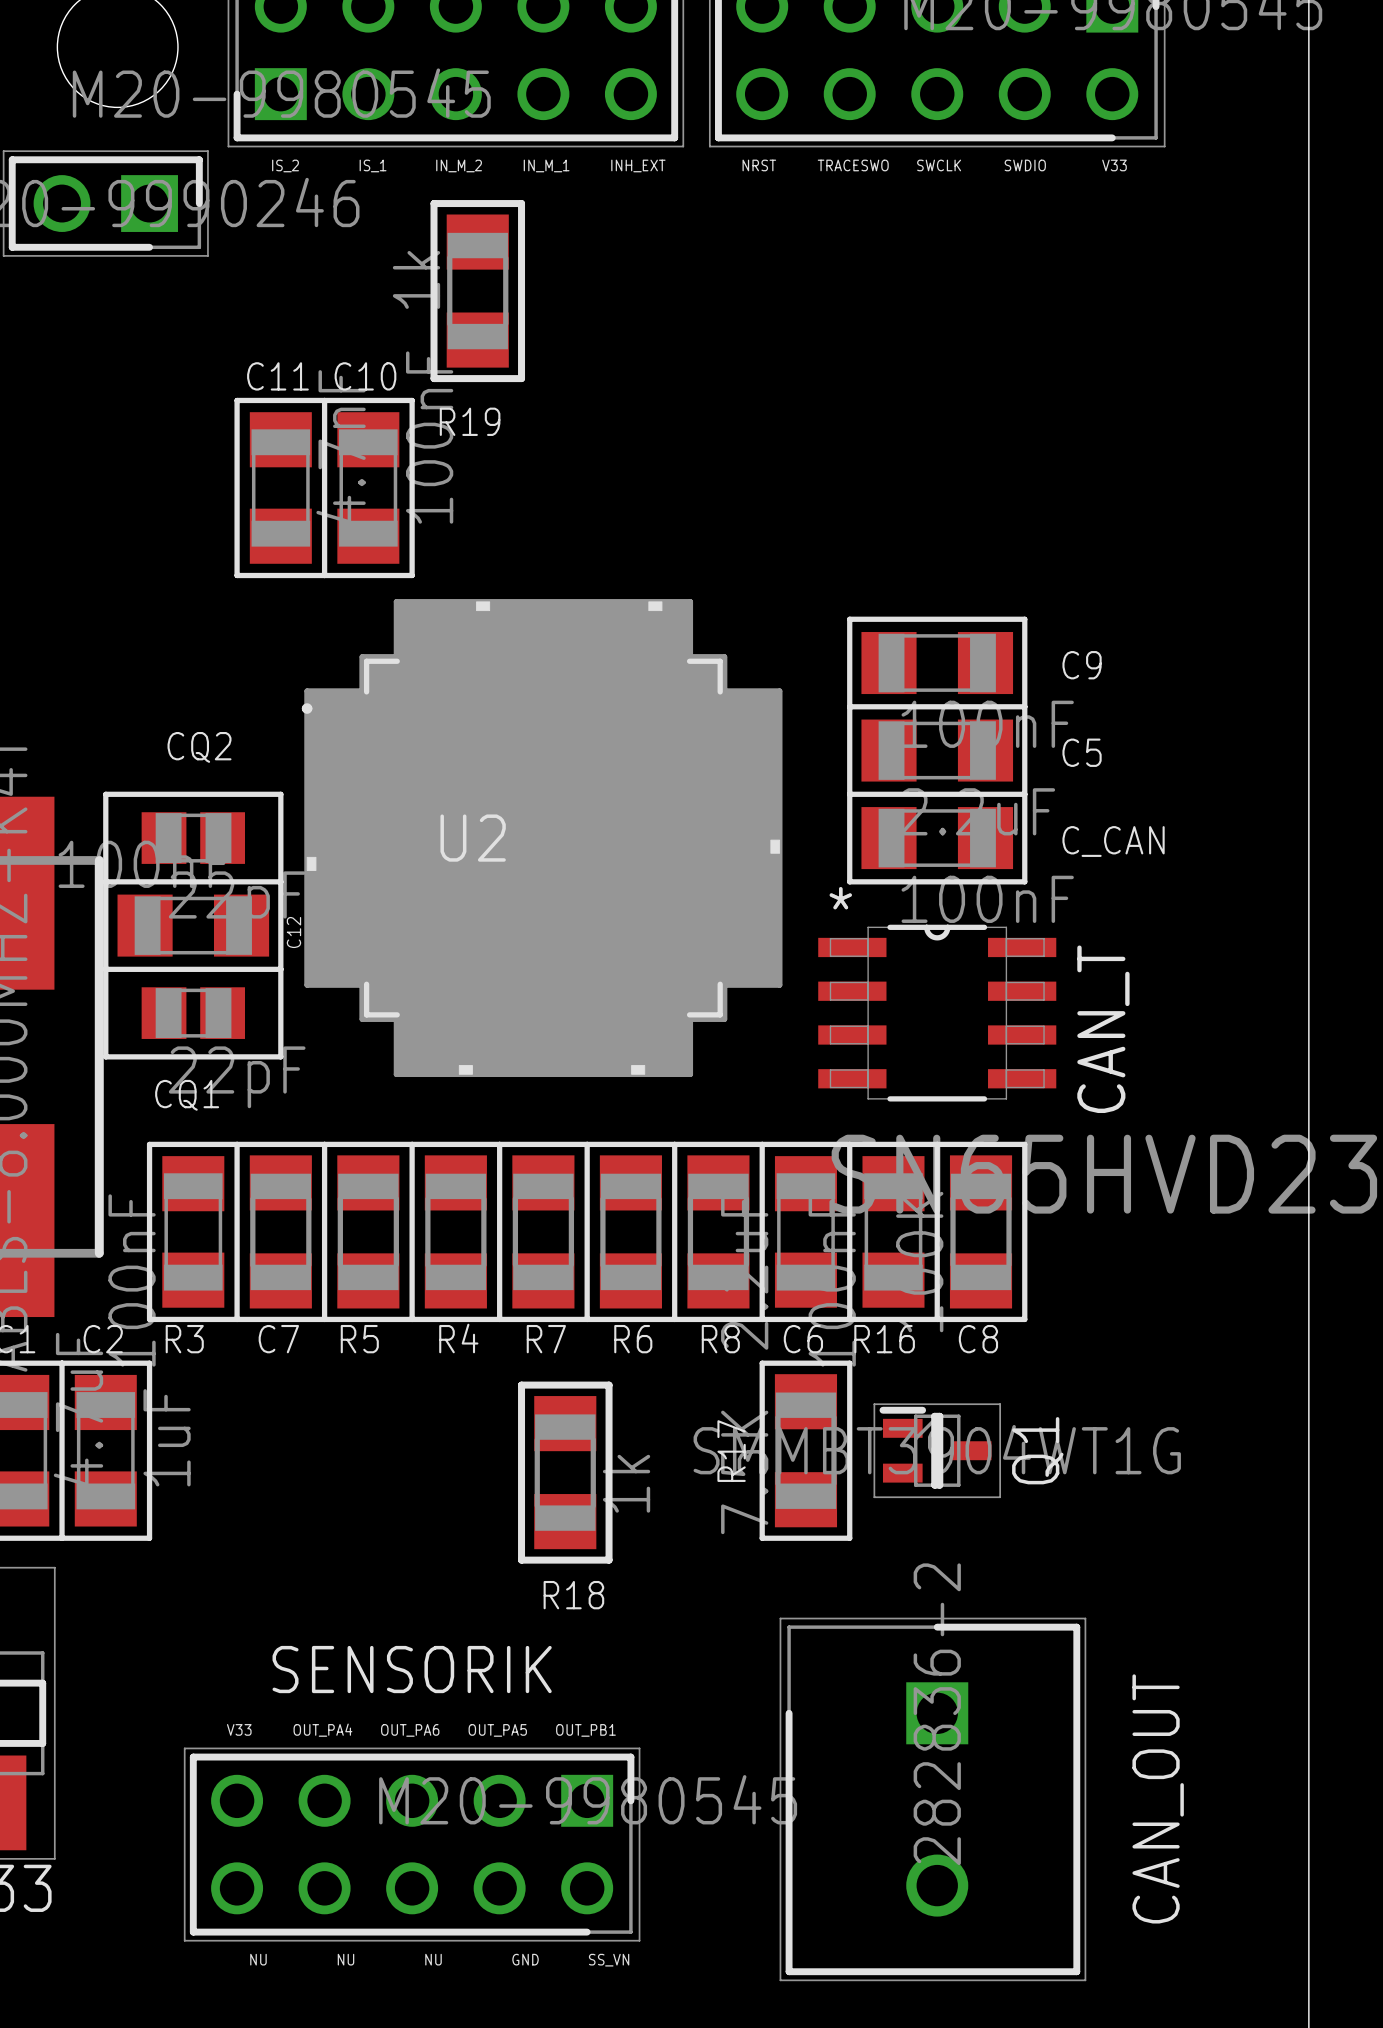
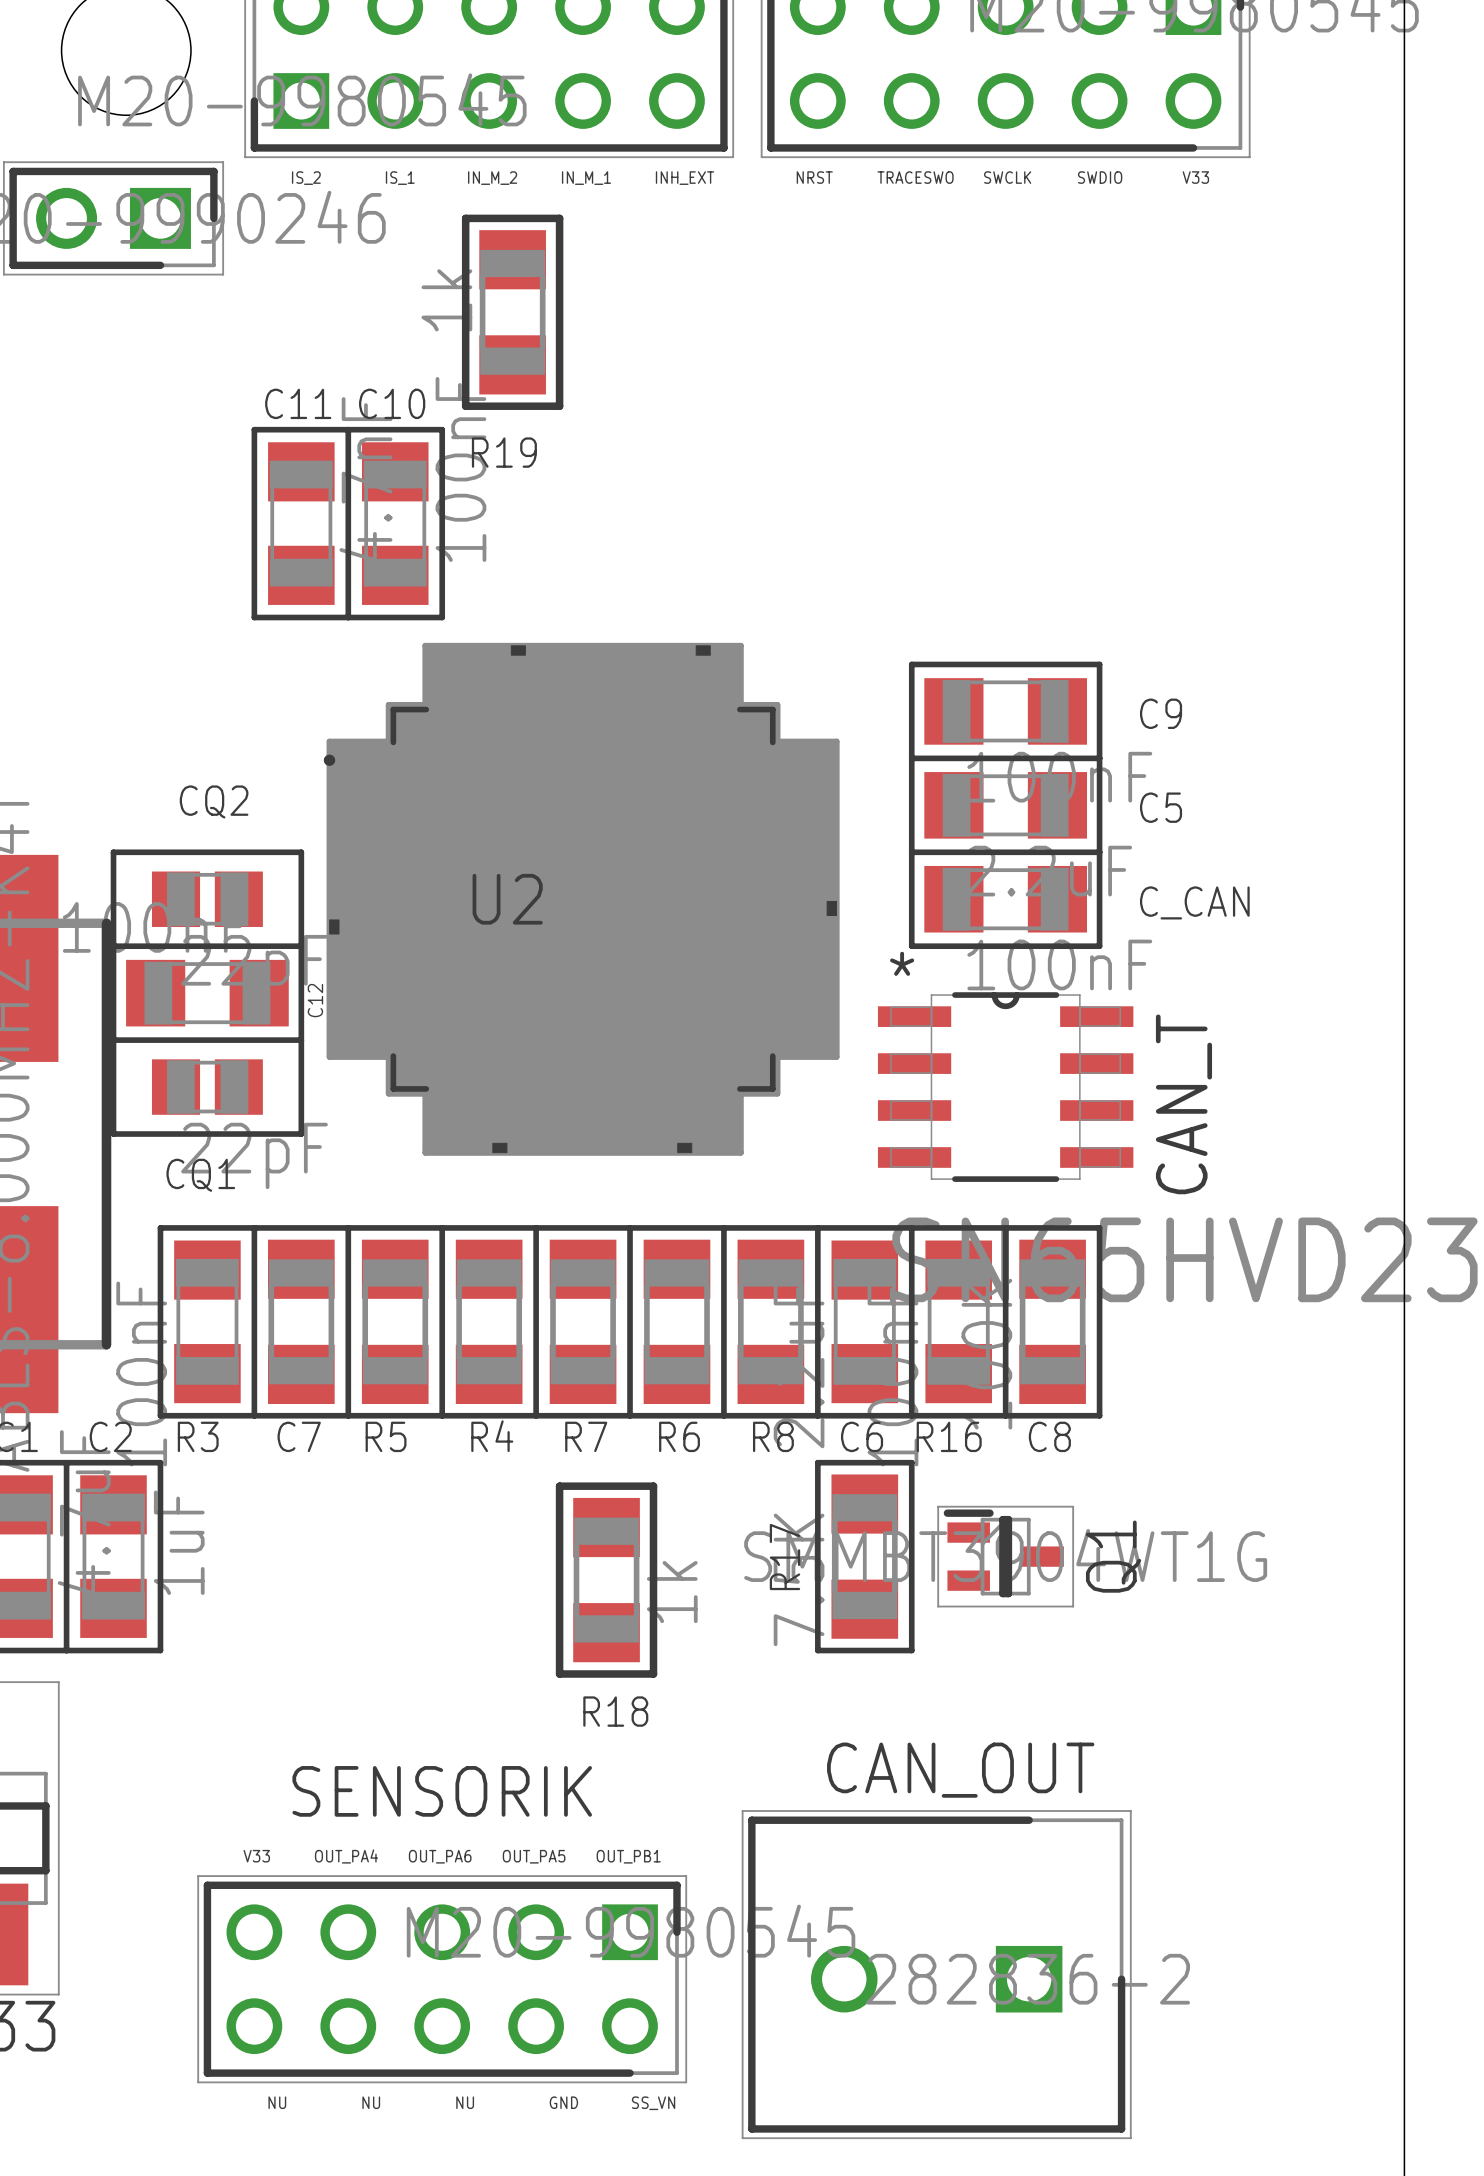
CAN_OUT name position: CAN_OUT (1158, 1798) -> CAN_OUT (960, 1770)
CAN_OUT rotation: 0° (932, 1799) -> 90° clockwise (936, 1974)

